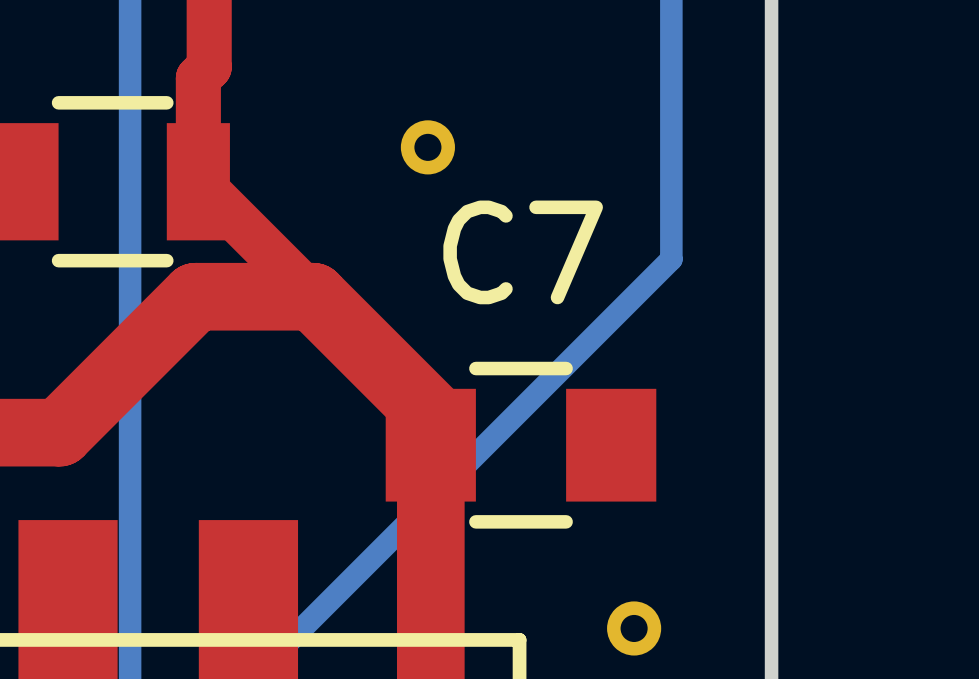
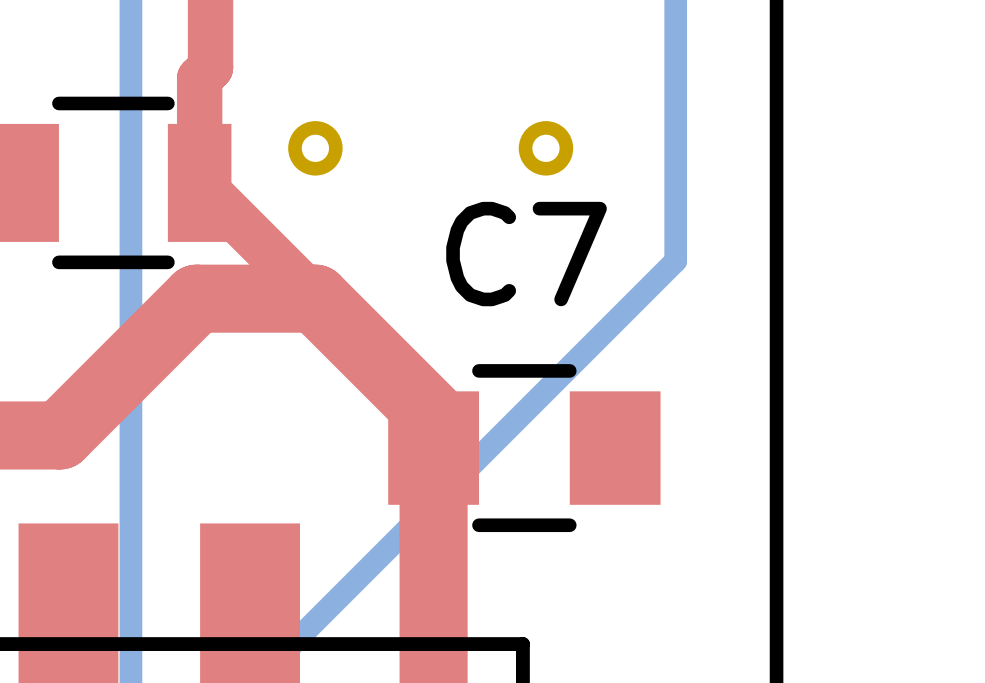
part: none -> (315, 148)
part: (427, 147) -> none
part: none -> (545, 148)
part: (634, 628) -> none

